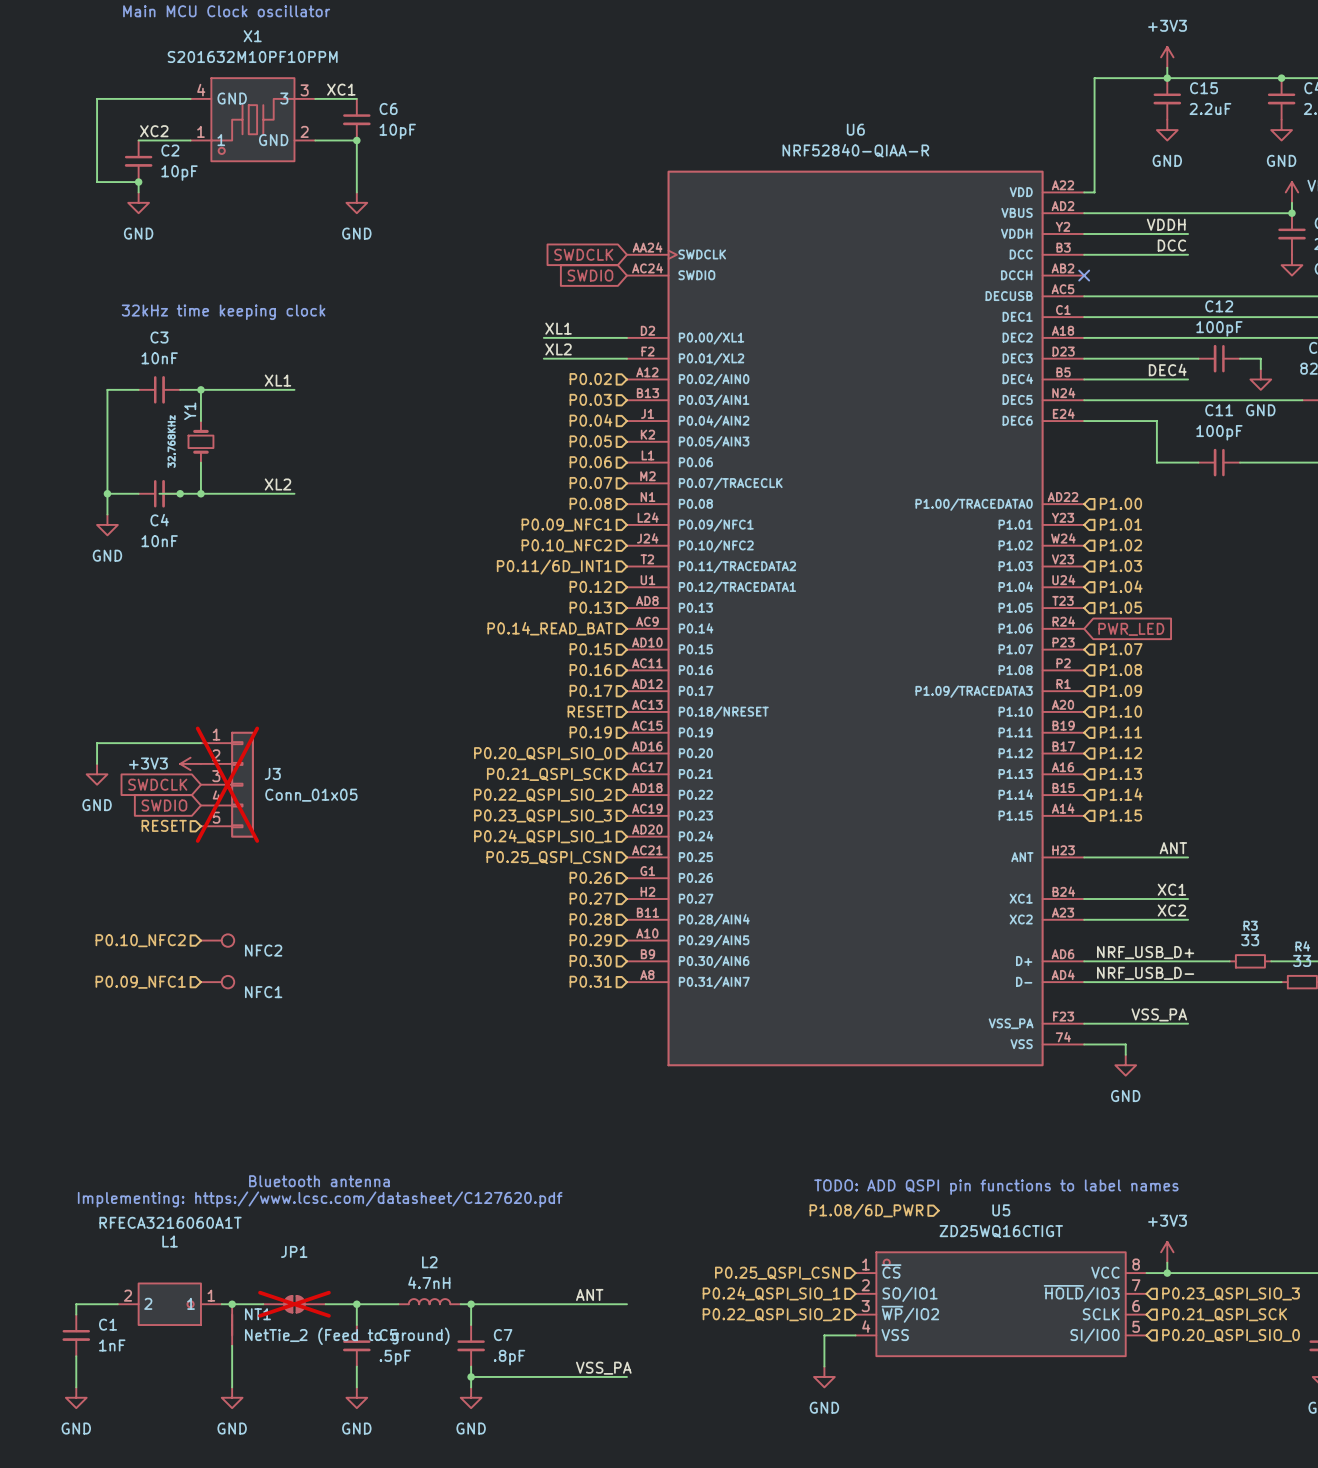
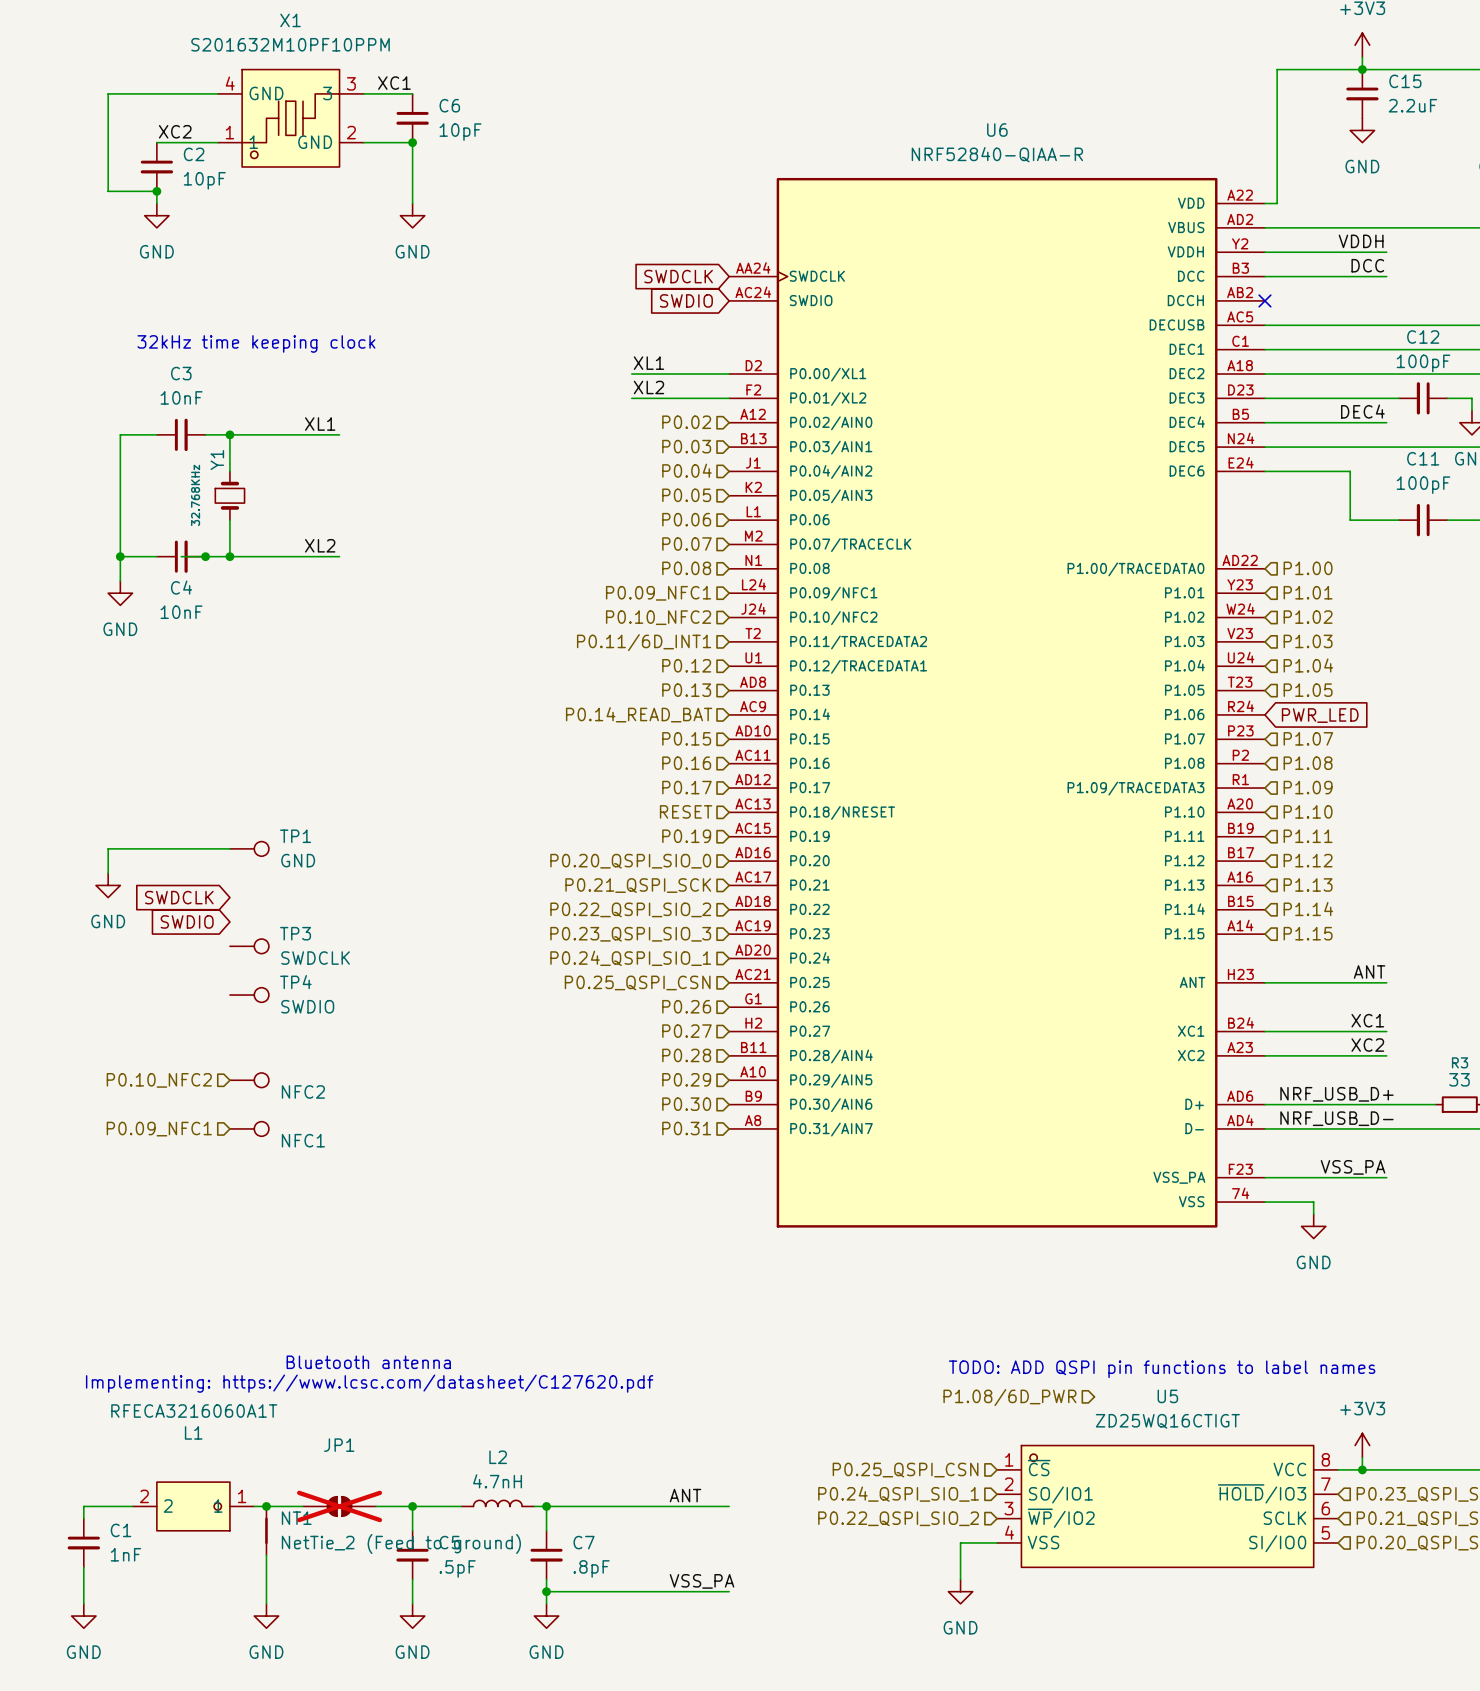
TP1: none -> GND (249, 848)
power symbol: +3V3 (190, 763) -> none
J3: Conn_01x05 (227, 784) -> none
hierarchical label: RESET (164, 825) -> none
TP3: none -> SWDCLK (249, 946)
TP4: none -> SWDIO (249, 995)

